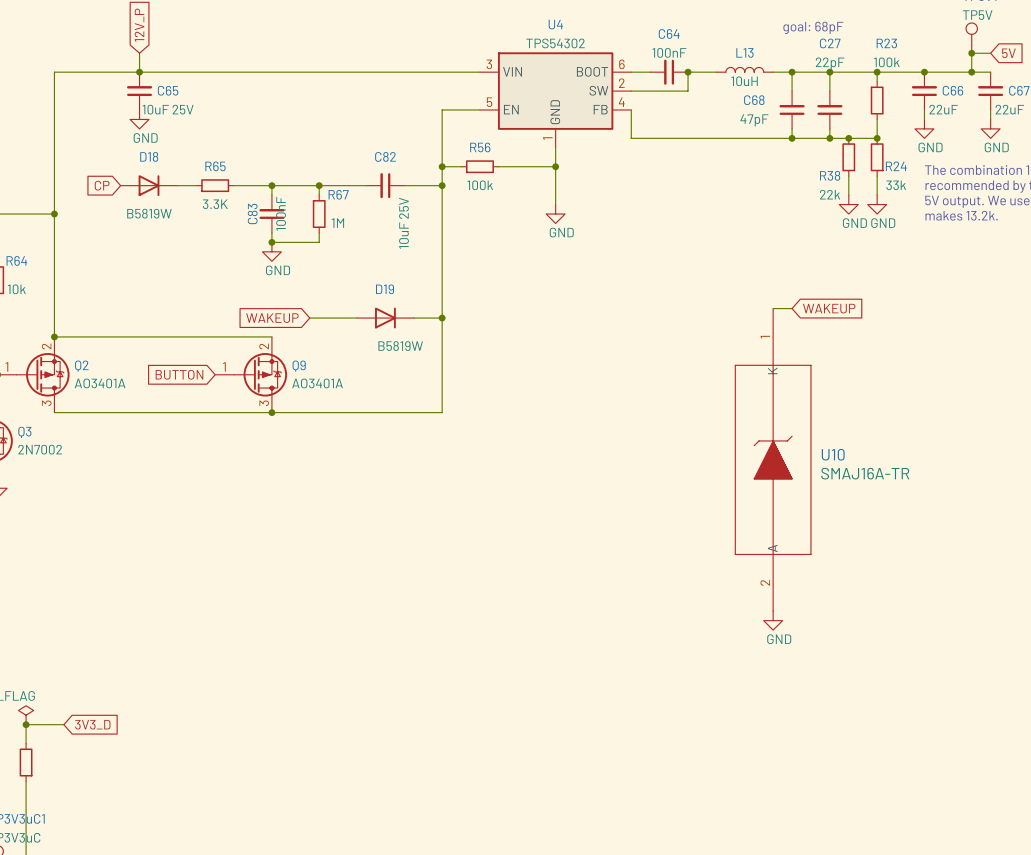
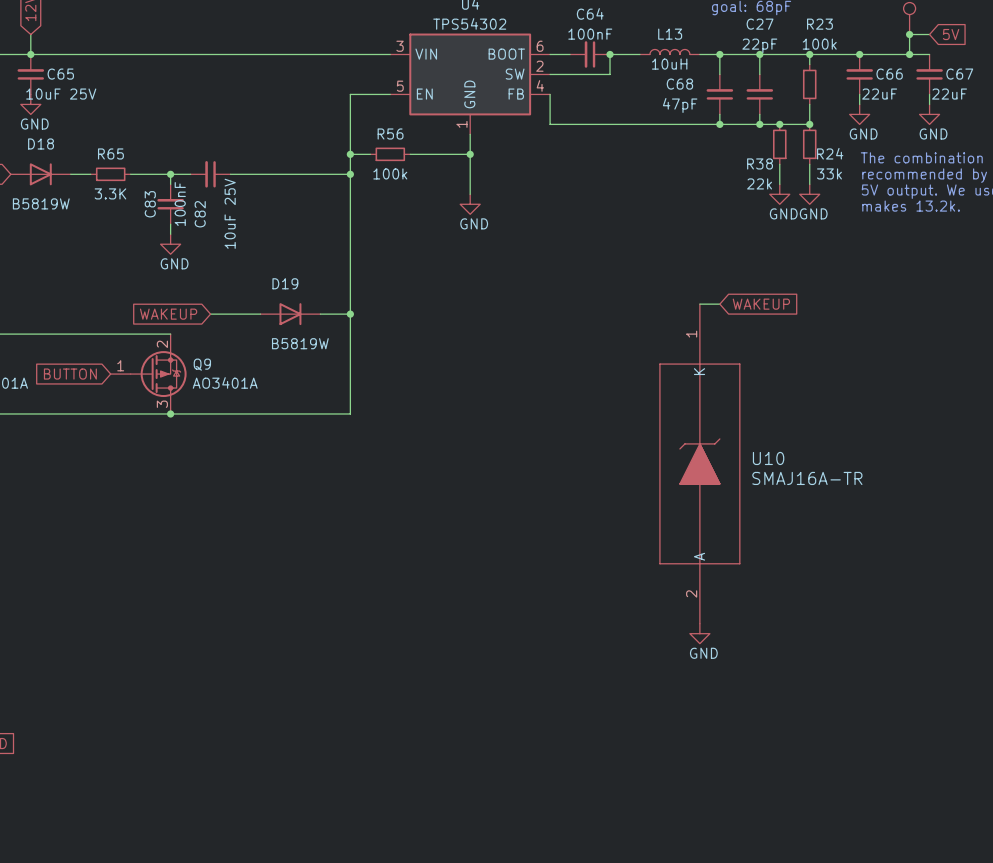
C82 name rotation: 0° (385, 156) -> 90° counterclockwise (200, 214)
C82 name position: C82 (385, 156) -> C82 (200, 214)
wire: (319, 185) (319, 195) -> none
junction: (319, 185) -> none
C82 position: (385, 185) -> (210, 174)
R67: 1M (319, 214) -> none
wire: (319, 232) (319, 242) (271, 242) -> none
junction: (271, 242) -> none

